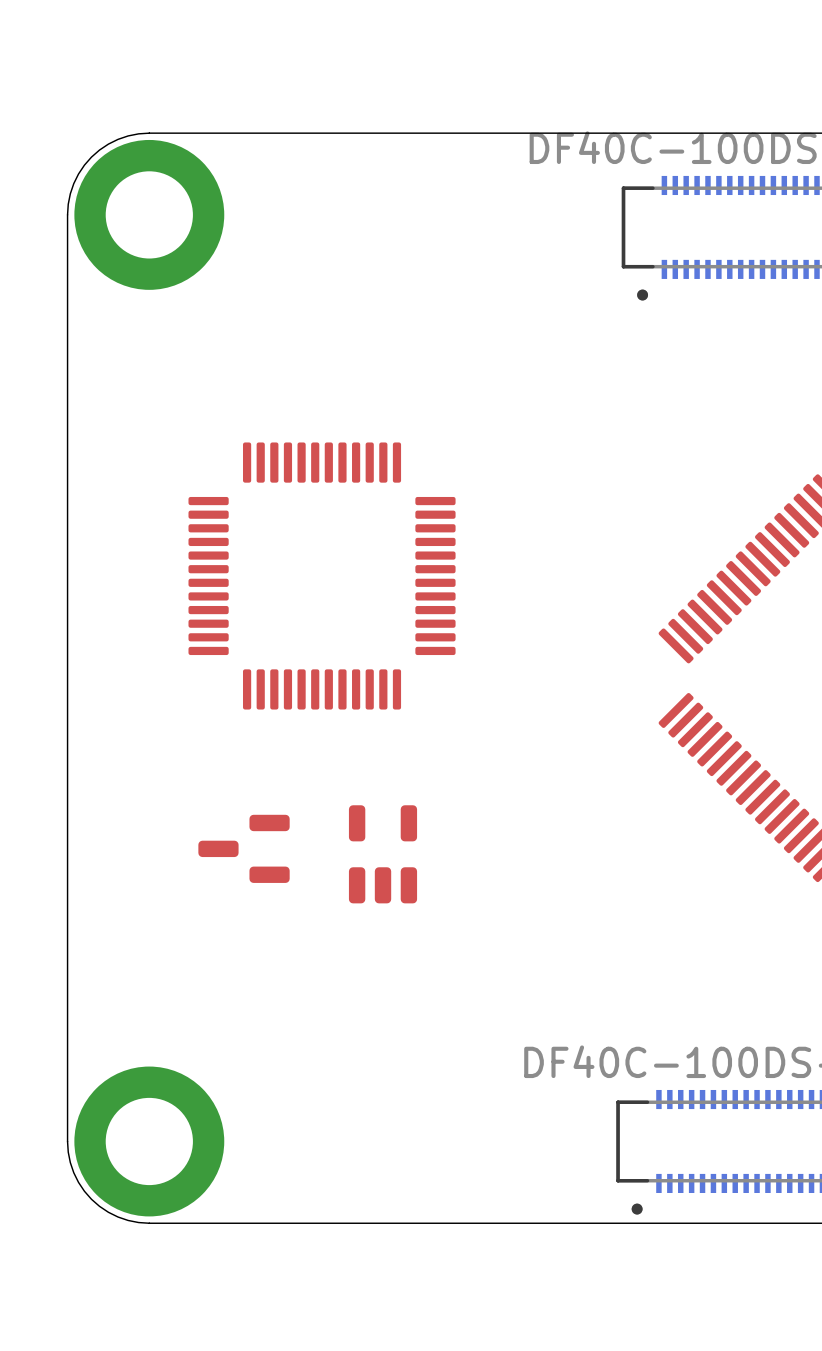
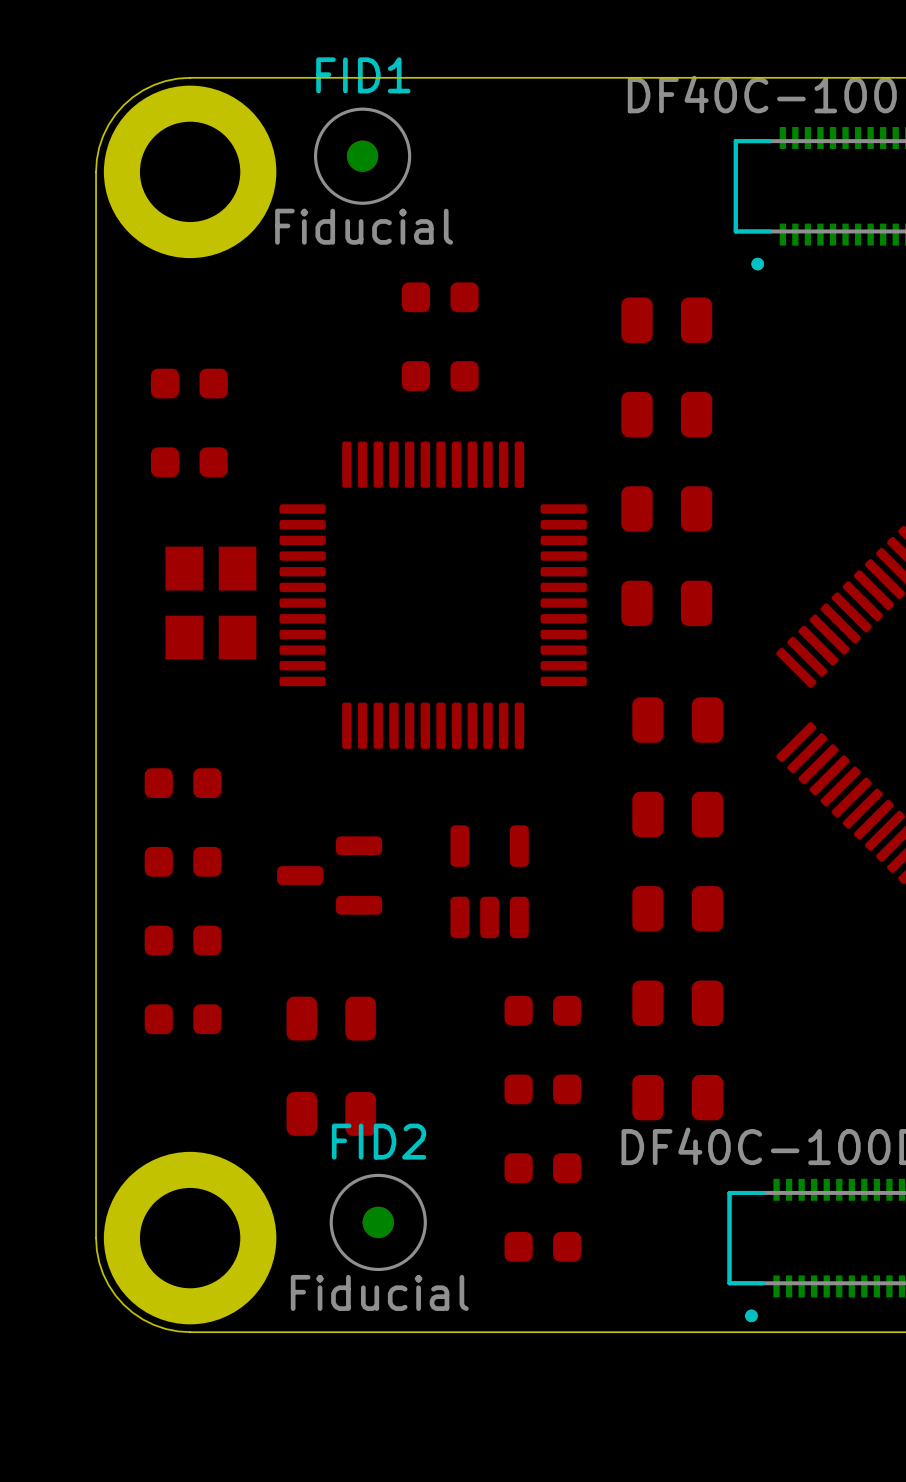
FID1: none -> Fiducial (362, 156)
part: none -> (440, 297)
part: none -> (666, 320)
part: none -> (440, 376)
part: none -> (189, 383)
part: none -> (666, 414)
part: none -> (189, 462)
part: none -> (666, 508)
part position: (322, 576) -> (433, 595)
part: none -> (210, 603)
part: none -> (666, 603)
part: none -> (677, 720)
part: none -> (183, 783)
part: none -> (677, 814)
part: none -> (183, 861)
part position: (244, 848) -> (329, 875)
part position: (383, 854) -> (489, 881)
part: none -> (677, 908)
part: none -> (183, 940)
part: none -> (677, 1003)
part: none -> (542, 1010)
part: none -> (331, 1018)
part: none -> (183, 1019)
part: none -> (542, 1089)
part: none -> (677, 1097)
part: none -> (331, 1113)
part: none -> (542, 1168)
FID2: none -> Fiducial (378, 1222)
part: none -> (542, 1246)

